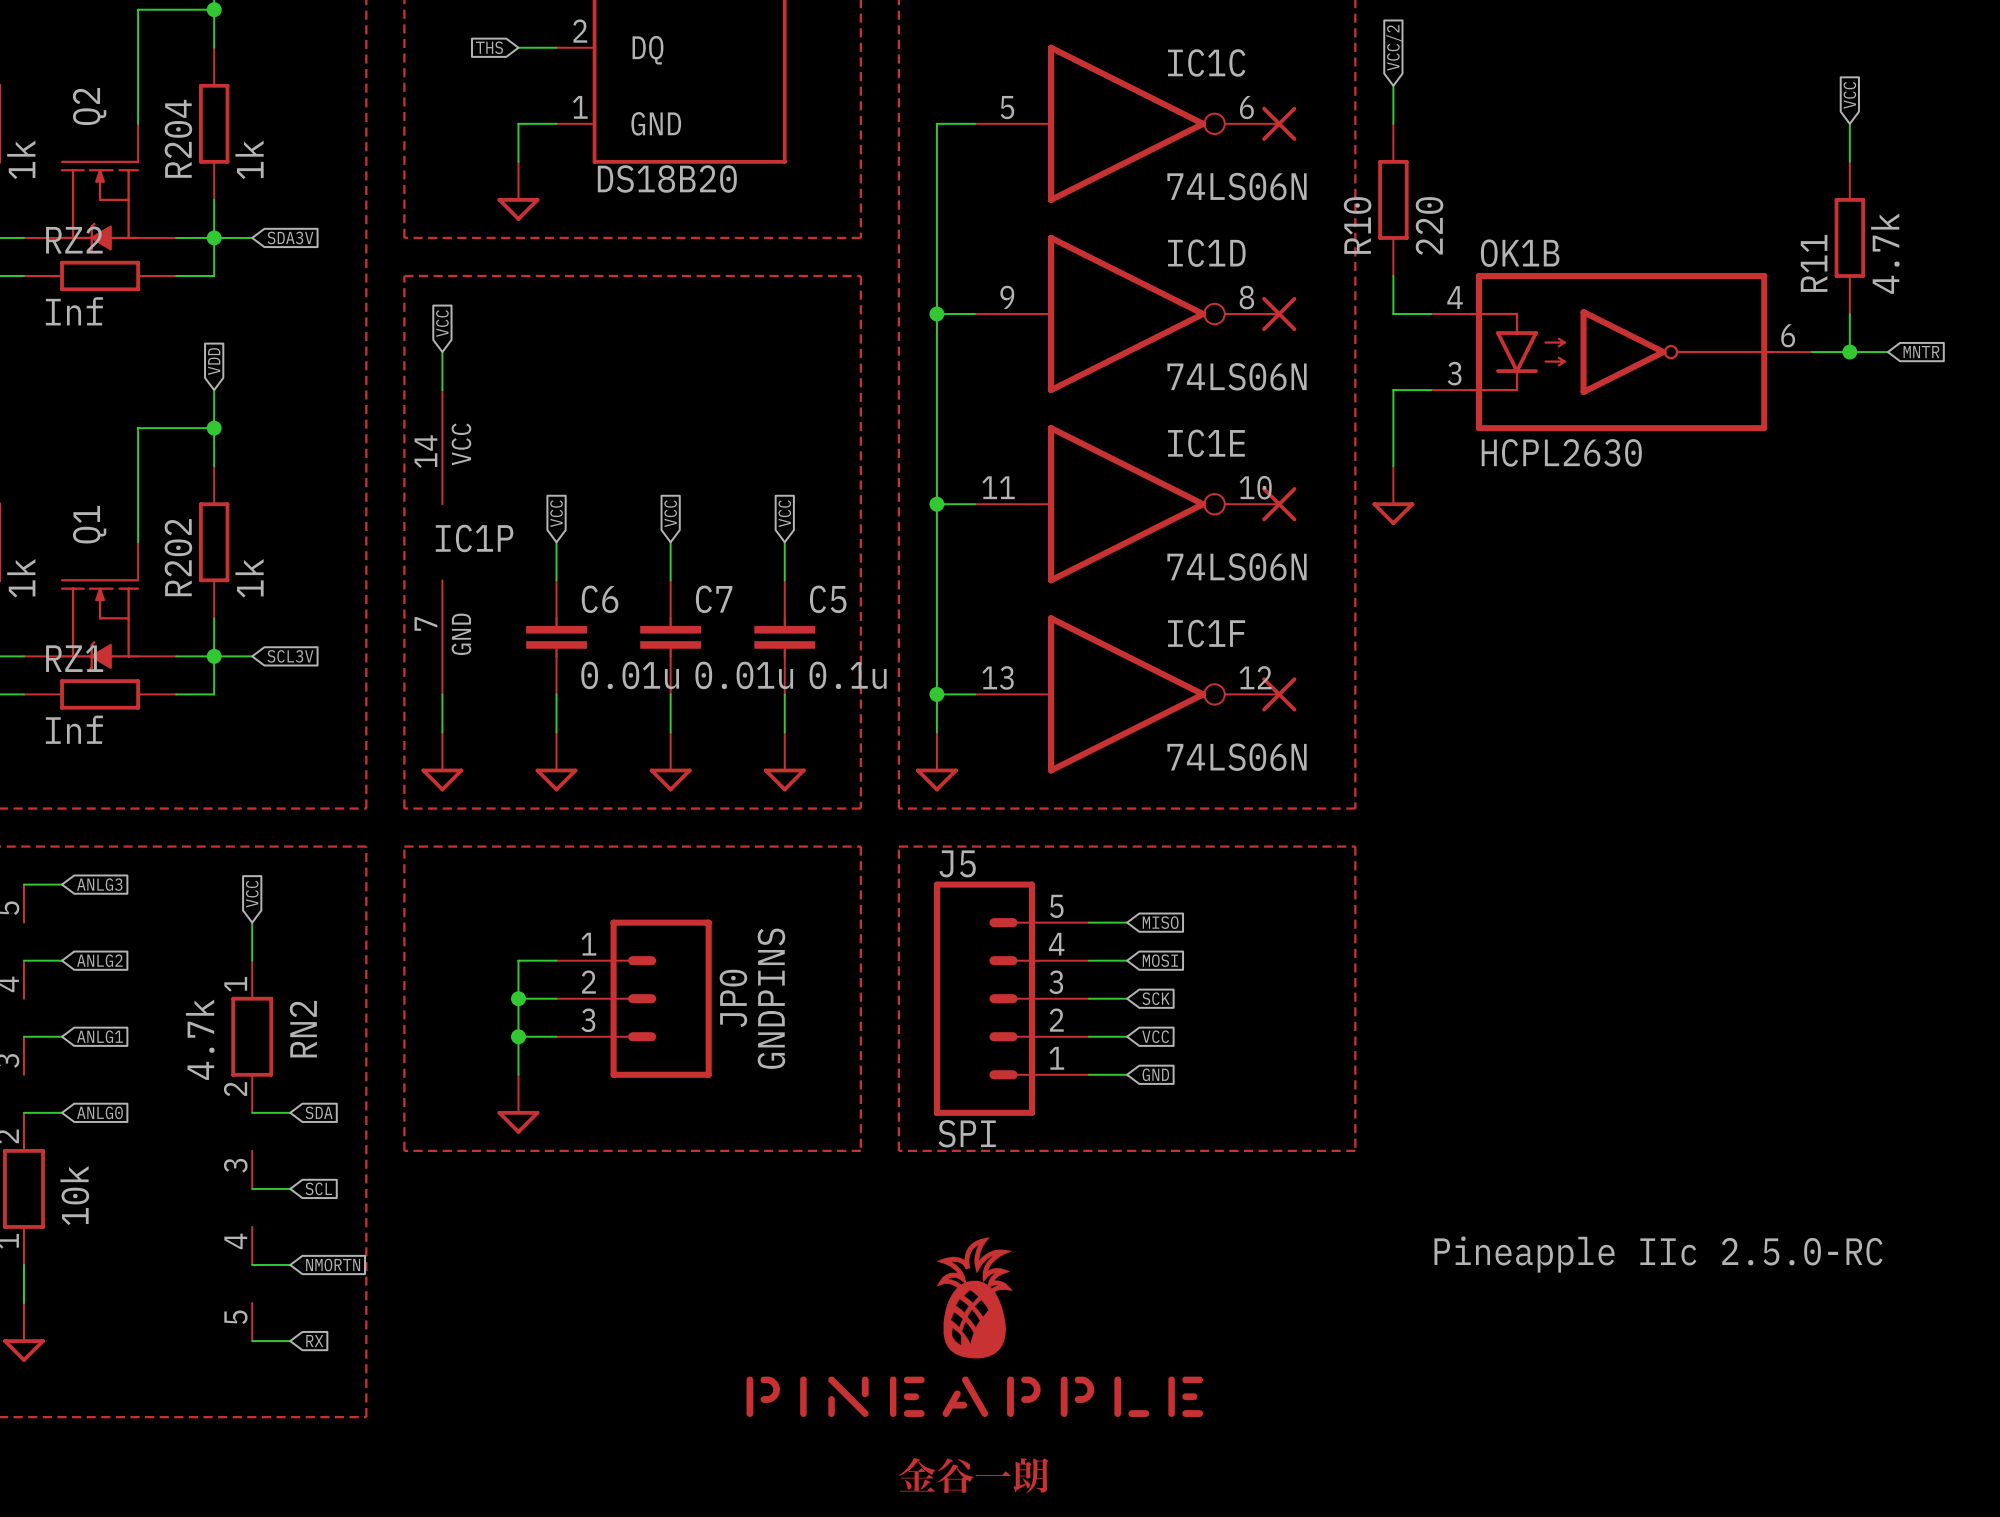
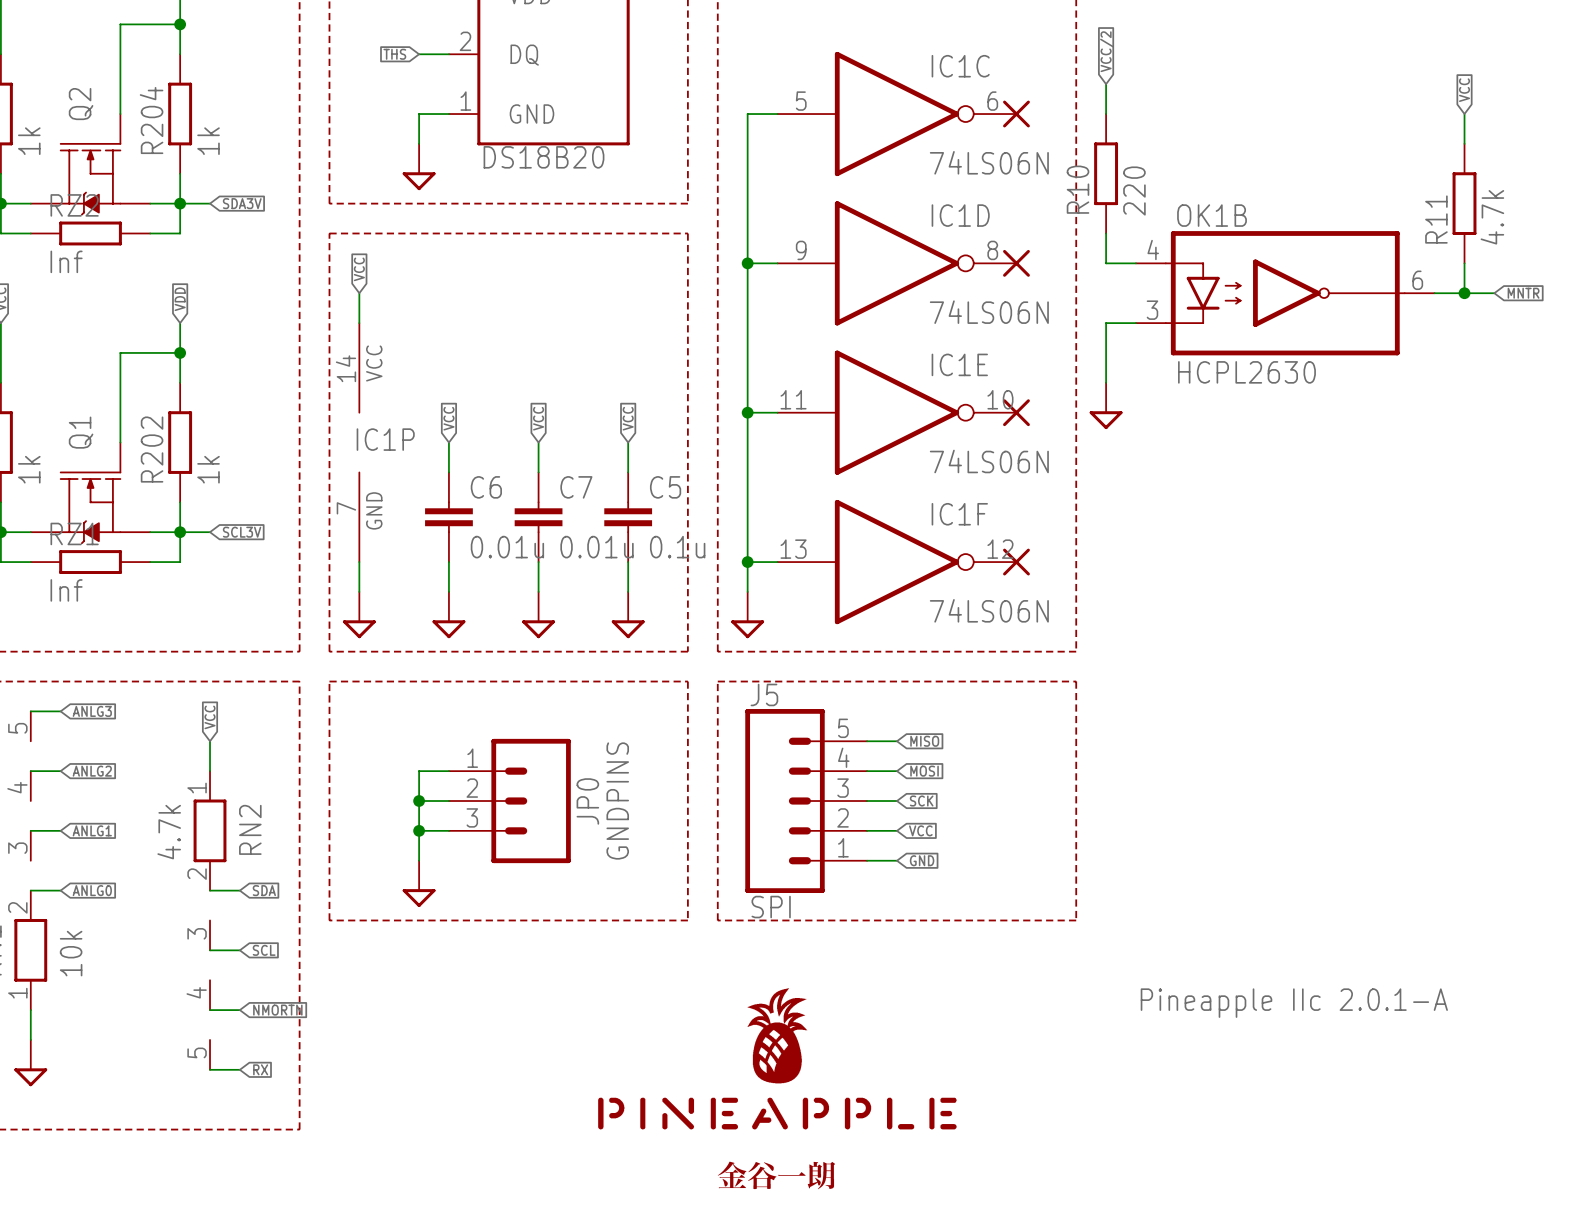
text: Pineapple IIc 2.5.0-RC (1658, 1254) -> Pineapple IIc 2.0.1-A (1294, 1003)

